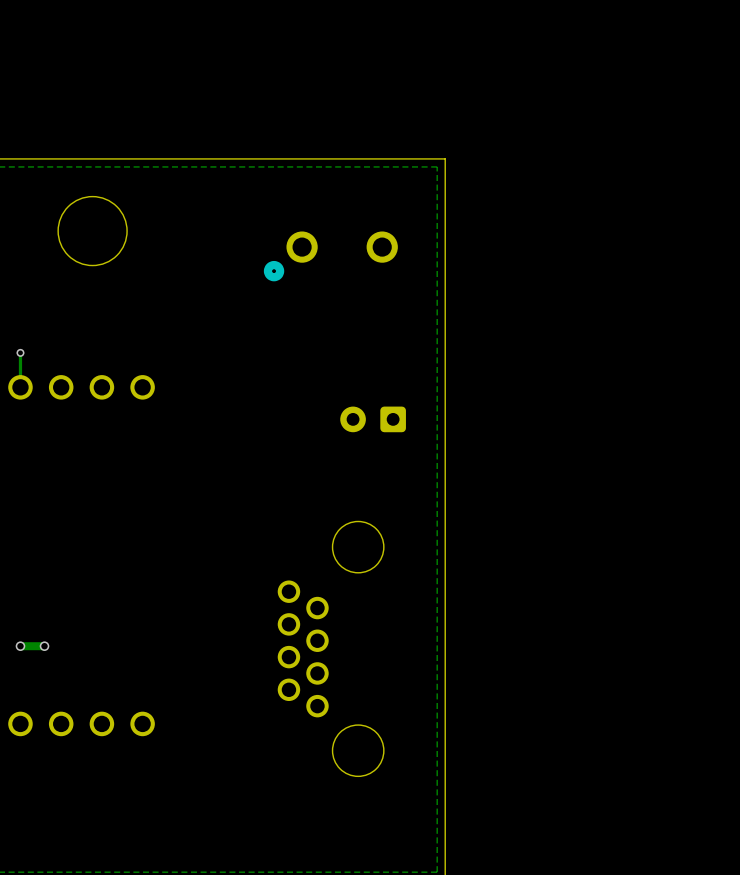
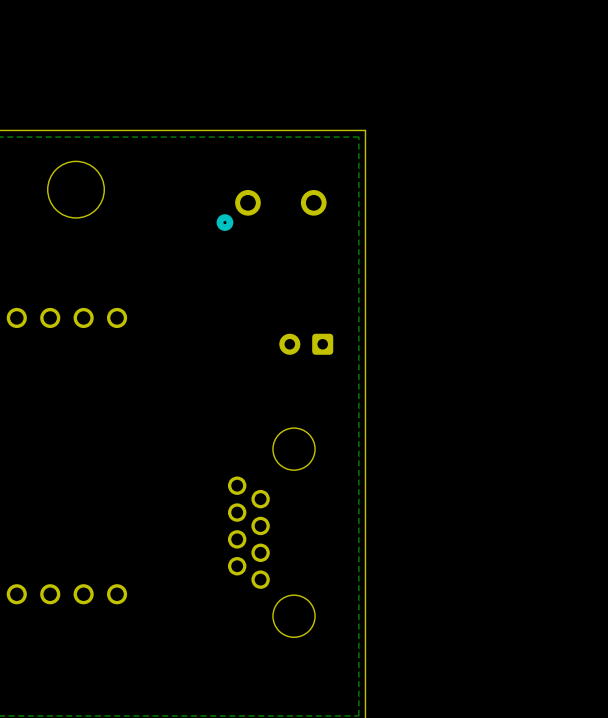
track: (20, 352) (20, 386) -> none
via: (20, 352) -> none
via: (20, 646) -> none
track: (44, 646) (20, 646) -> none
via: (44, 646) -> none

